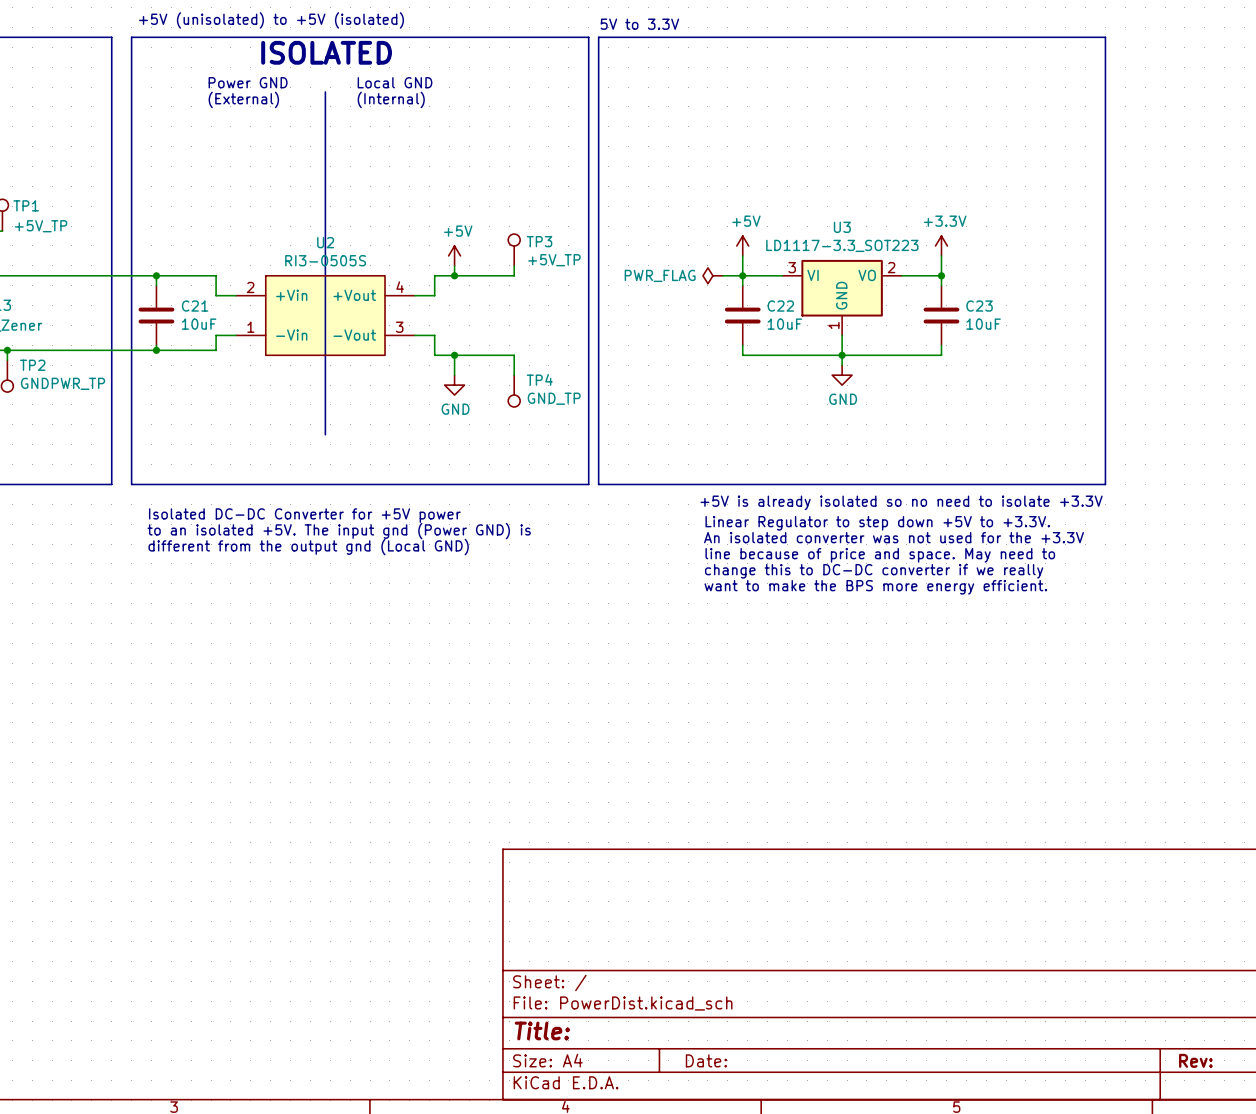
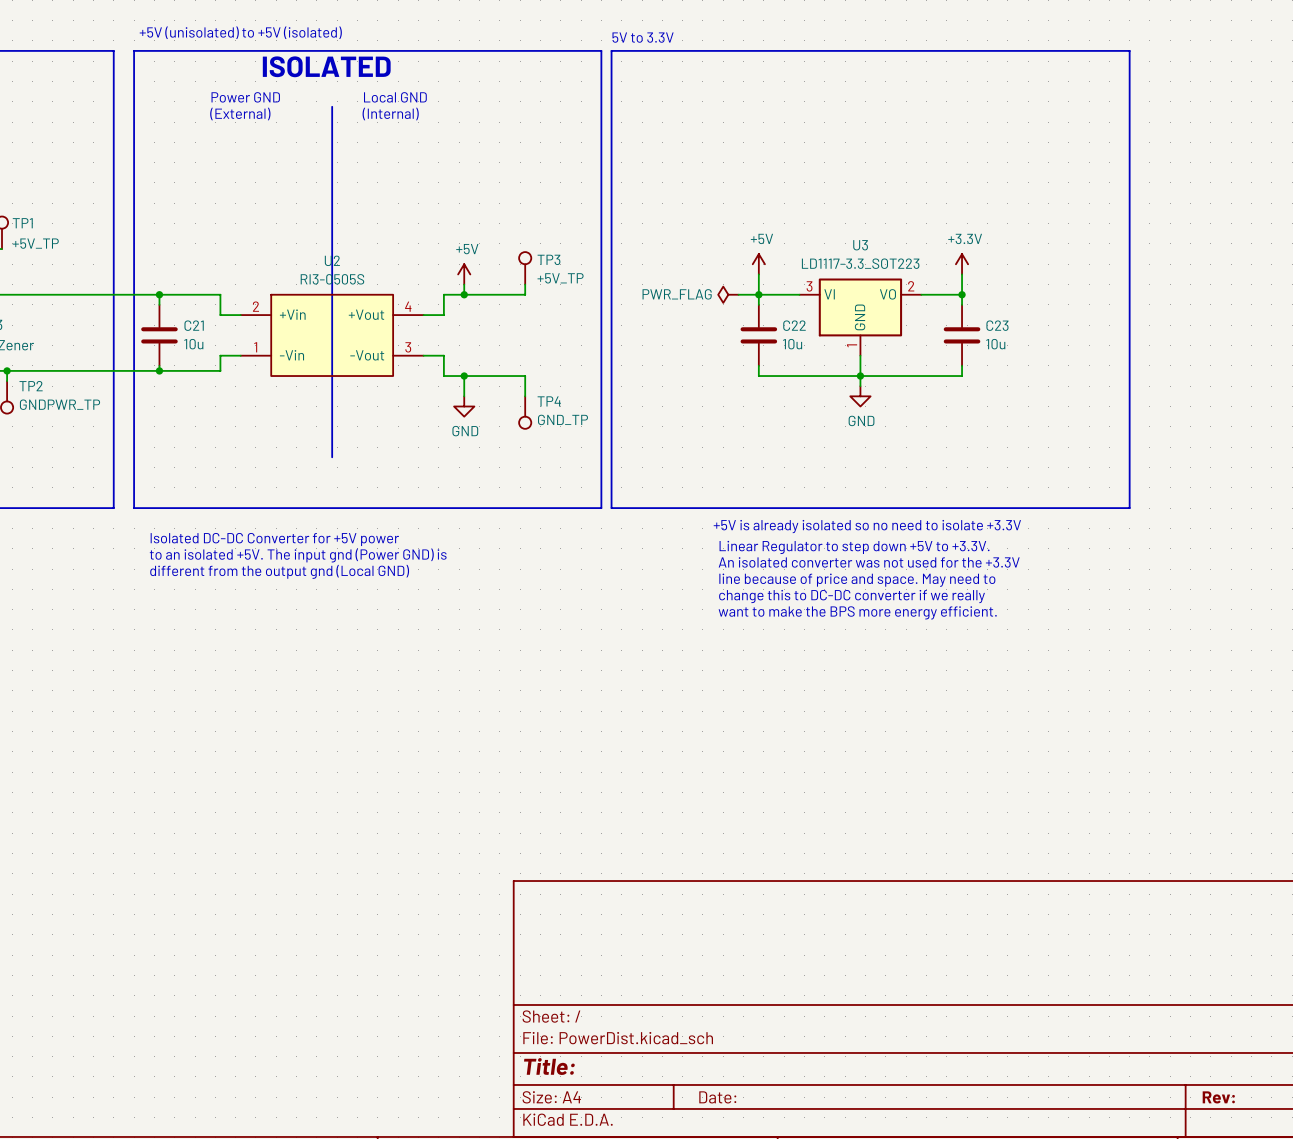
C21 value: 10uF (199, 324) -> 10u (193, 344)
C22 value: 10uF (784, 324) -> 10u (792, 344)
C23 value: 10uF (983, 324) -> 10u (995, 344)

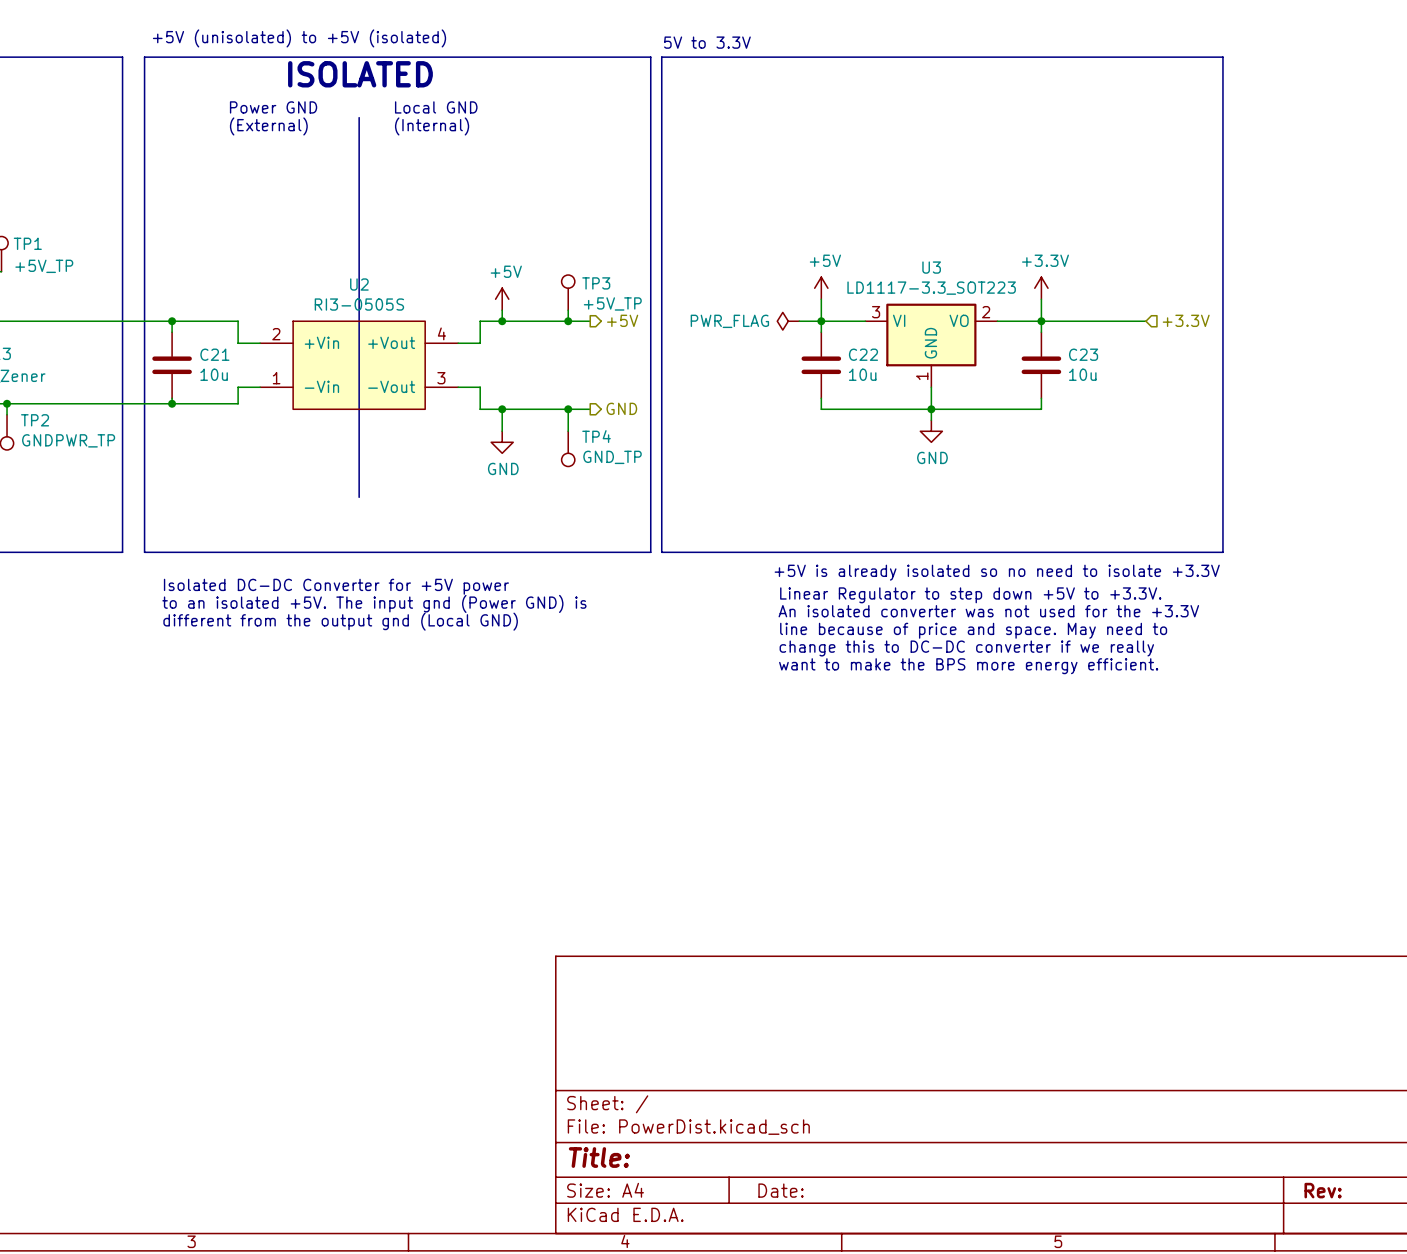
wire: none -> (568, 321) (590, 321)
junction: none -> (568, 321)
hierarchical label: none -> +5V (622, 320)
wire: none -> (1041, 321) (1145, 321)
hierarchical label: none -> +3.3V (1186, 320)
hierarchical label: none -> GND (621, 408)
wire: none -> (568, 409) (590, 409)
junction: none -> (568, 409)

